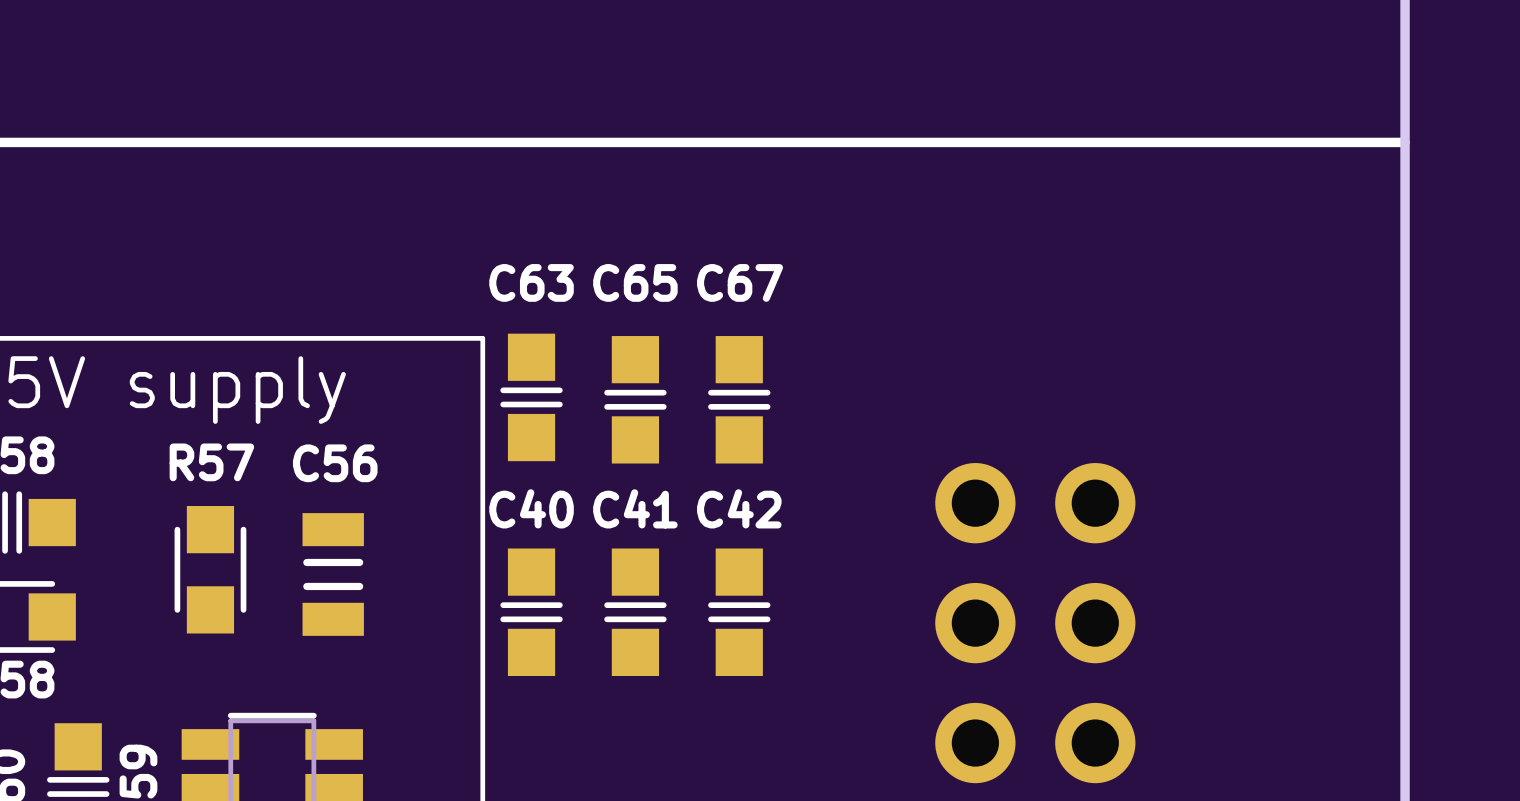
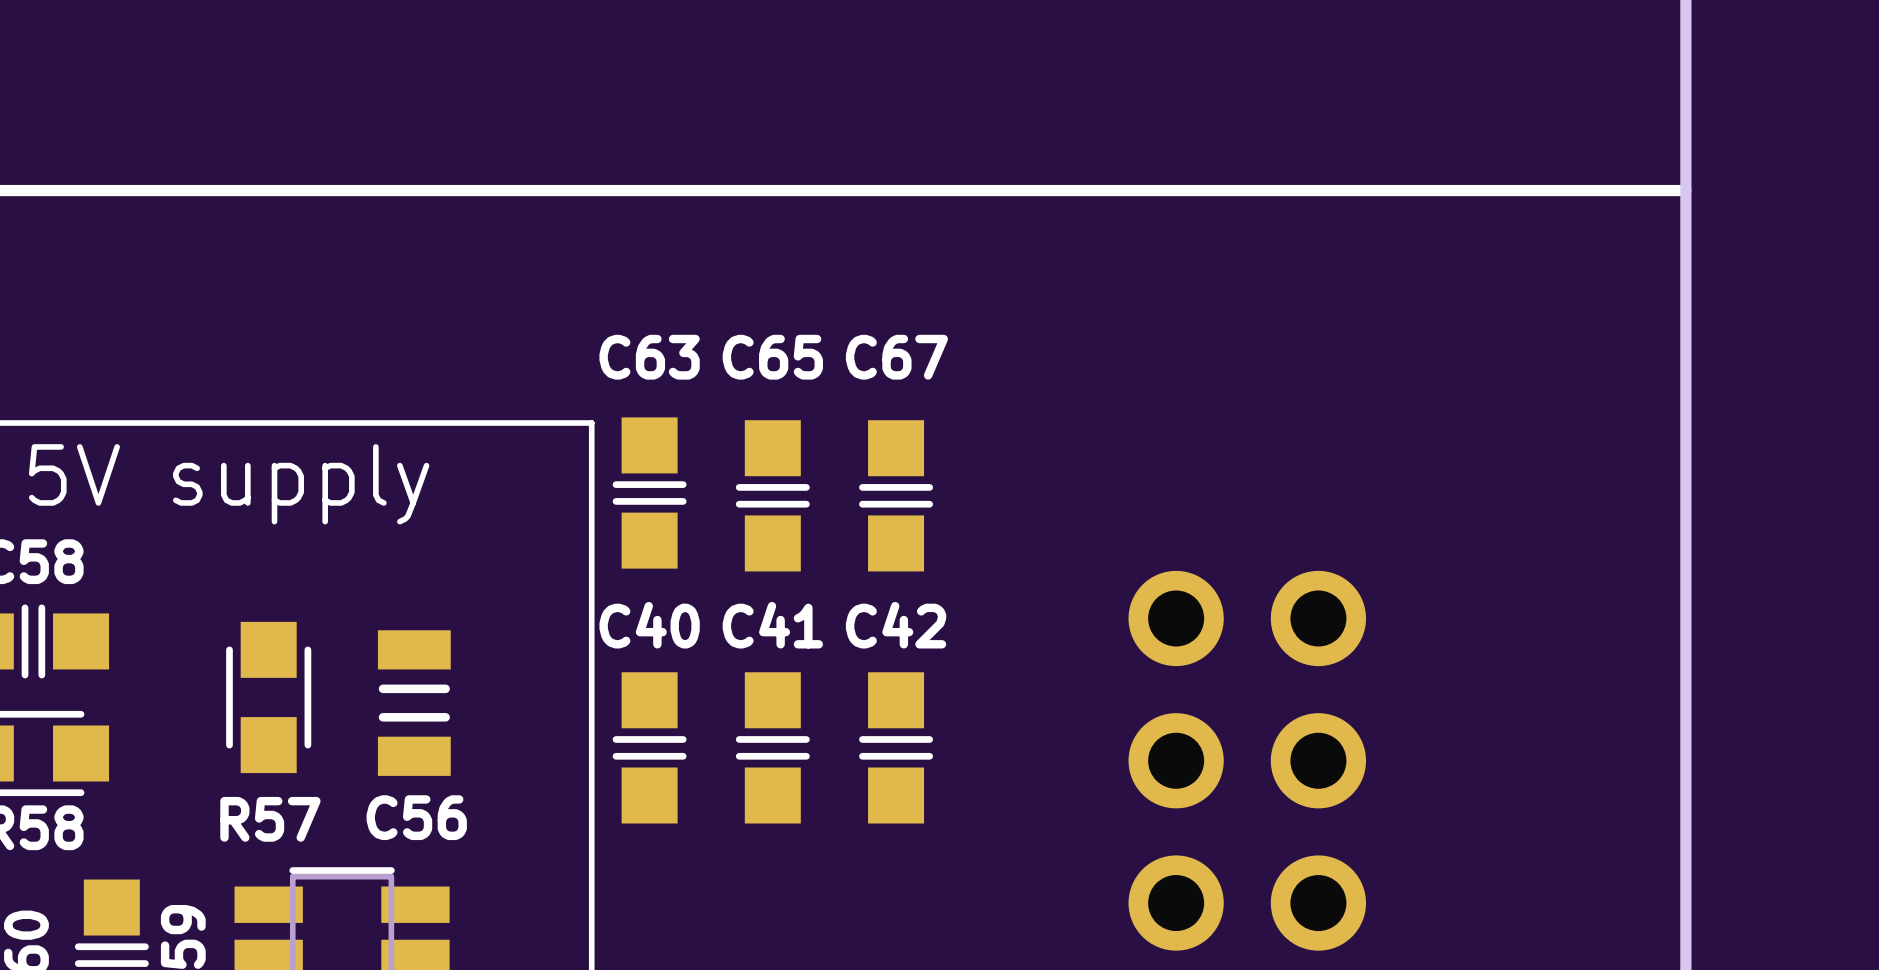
R57 name position: R57 (211, 462) -> R57 (270, 819)
C56 name position: C56 (335, 463) -> C56 (416, 817)

